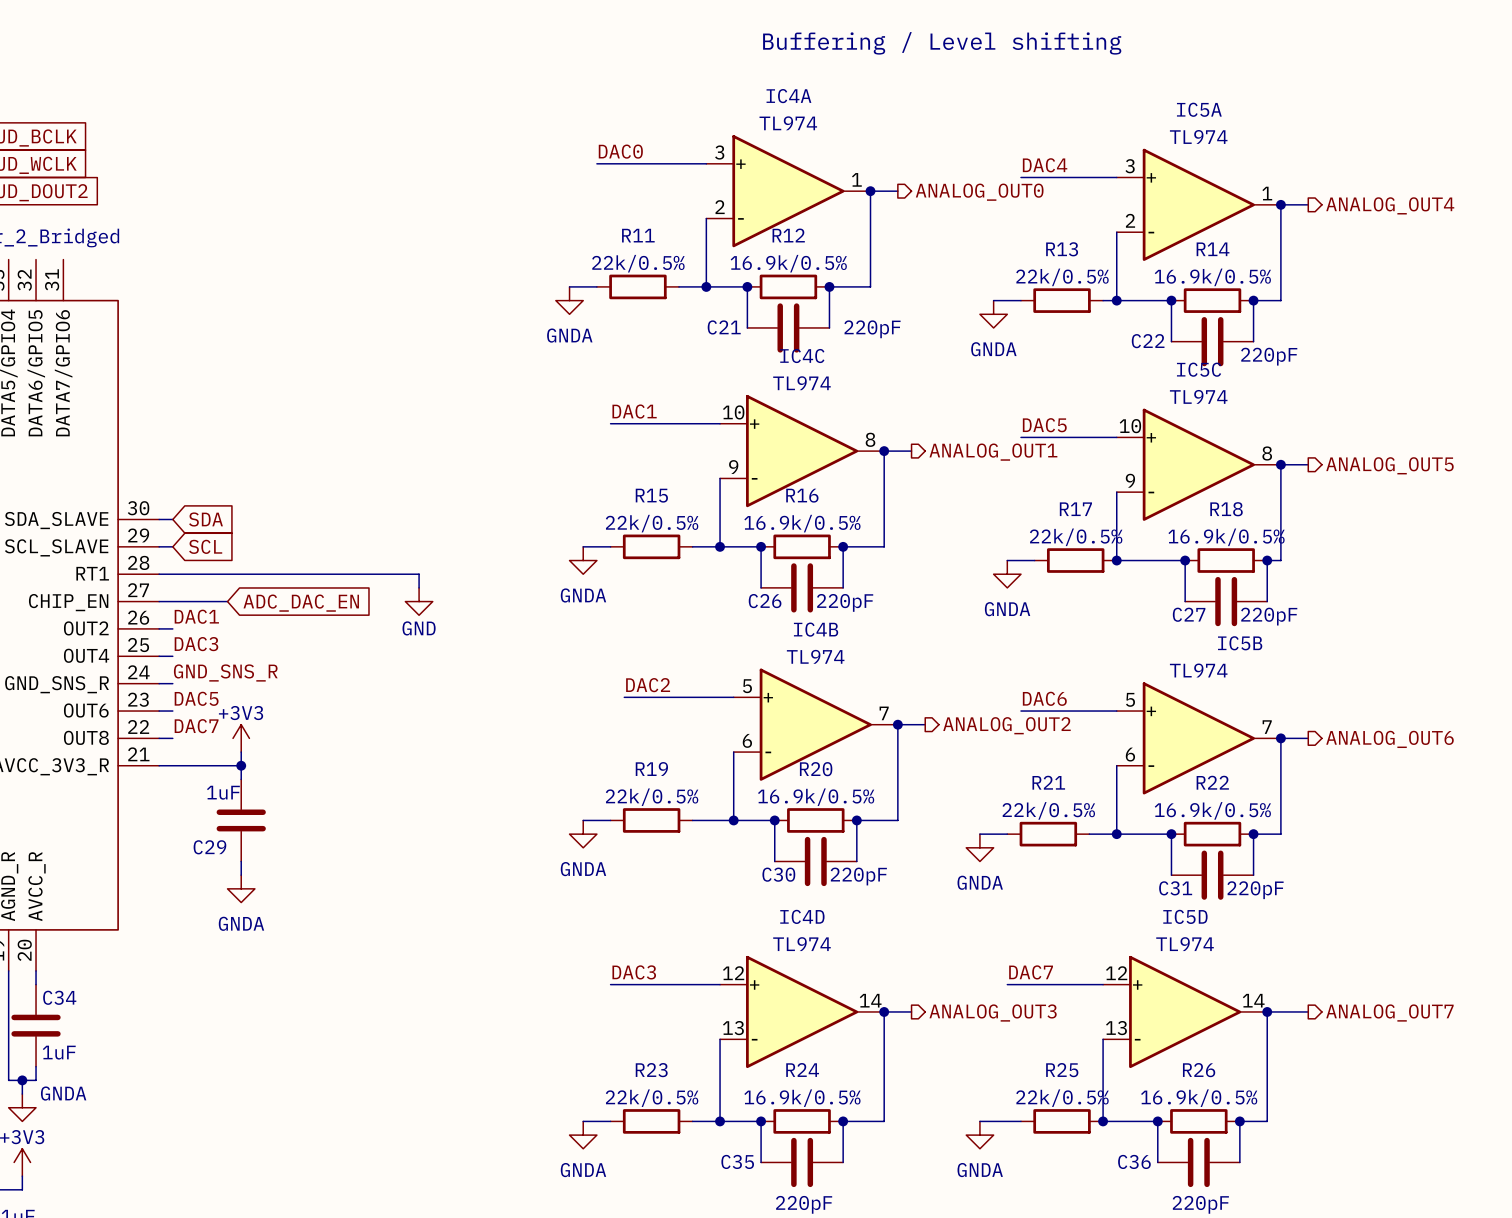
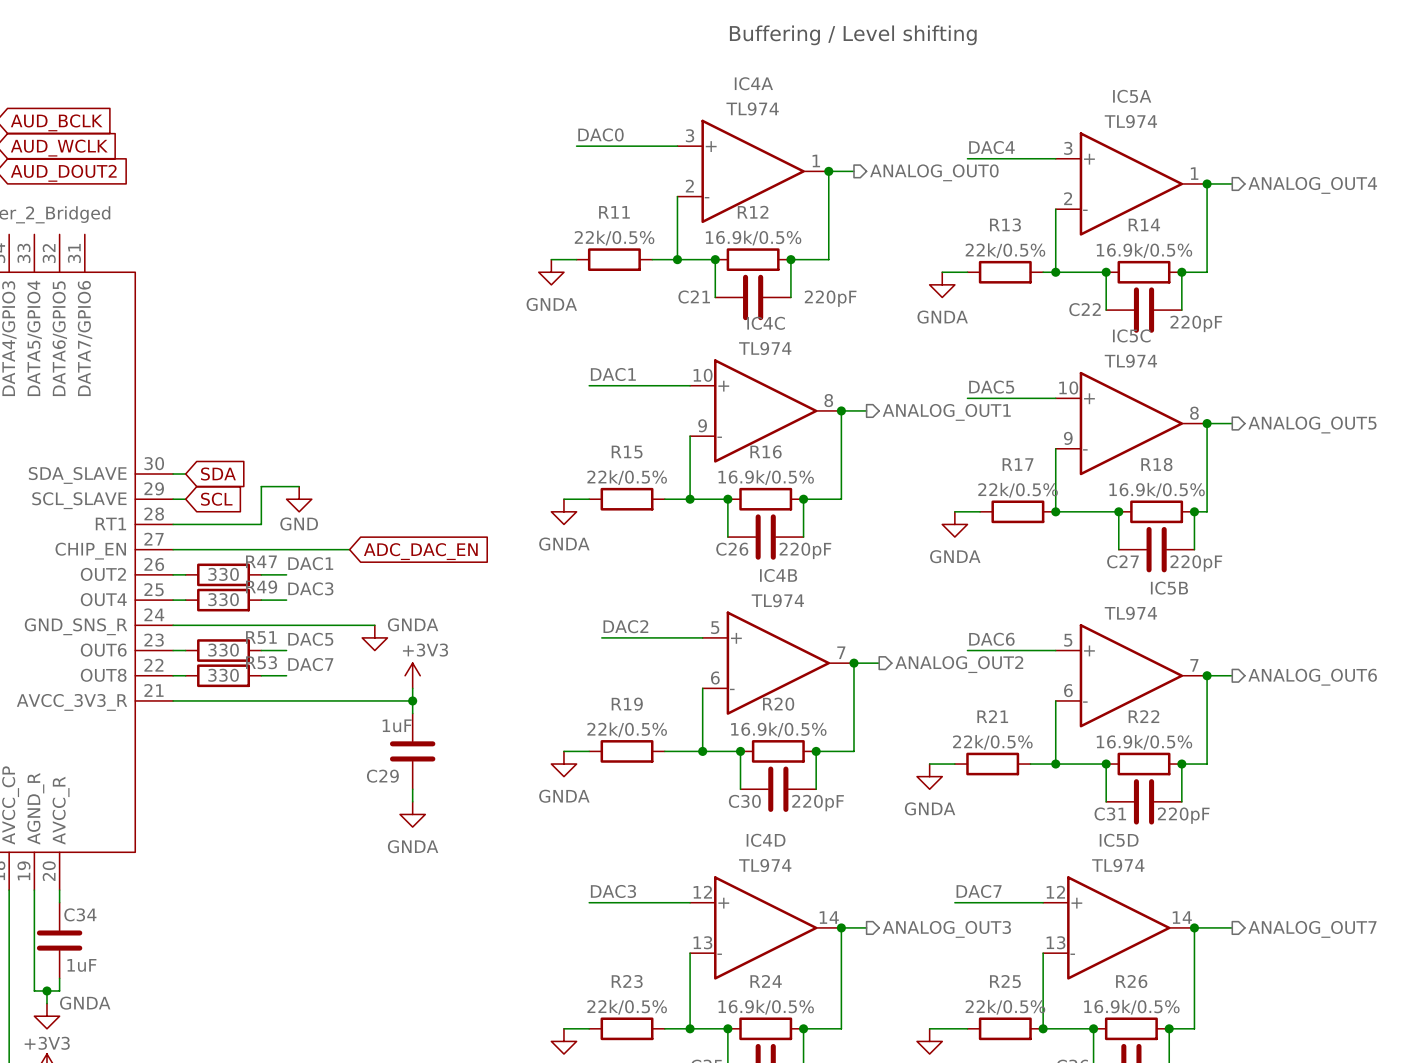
wire: (254, 574) (419, 574) (419, 587) -> (261, 524) (261, 486) (299, 486)
wire: none -> (236, 549) (349, 549)
power symbol position: GND (419, 601) -> GND (299, 499)
global label position: ADC_DAC_EN (301, 603) -> ADC_DAC_EN (420, 551)
label position: DAC1 (196, 616) -> DAC1 (310, 563)
R47: none -> 330 (223, 574)
wire: none -> (261, 574) (286, 574)
label position: DAC3 (196, 644) -> DAC3 (310, 588)
R49: none -> 330 (223, 600)
wire: none -> (261, 600) (286, 600)
label: GND_SNS_R (225, 672) -> none
wire: none -> (185, 625) (374, 625)
power symbol: none -> GNDA (374, 637)
label position: DAC5 (196, 698) -> DAC5 (310, 639)
R51: none -> 330 (223, 650)
wire: none -> (261, 650) (286, 650)
power symbol text position: +3V3 (241, 713) -> +3V3 (425, 650)
label position: DAC7 (196, 726) -> DAC7 (310, 664)
R53: none -> 330 (223, 675)
power symbol position: +3V3 (241, 738) -> +3V3 (412, 675)
wire: none -> (261, 675) (286, 675)
wire: (241, 752) (241, 779) -> (412, 688) (412, 713)
wire: none -> (248, 700) (412, 700)
junction: (241, 765) -> none
junction: none -> (412, 700)
C29 position: (241, 820) -> (412, 751)
wire: (241, 861) (241, 875) -> (412, 789) (412, 801)
power symbol: GNDA (241, 888) -> none
power symbol: none -> GNDA (412, 814)

